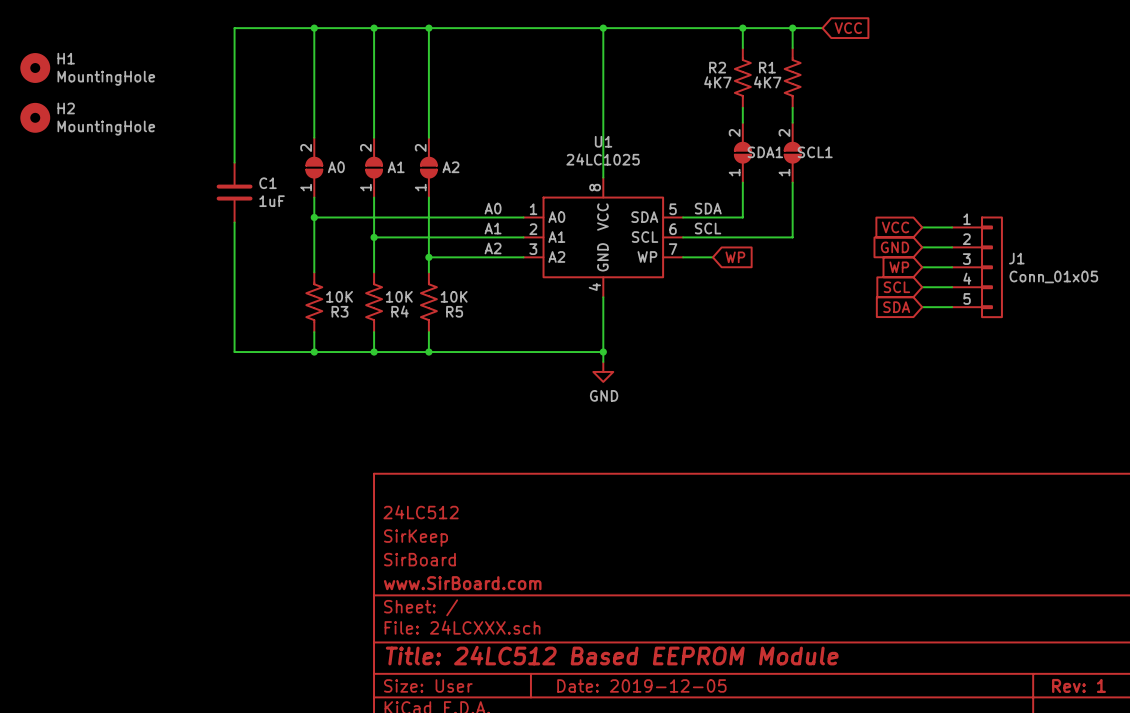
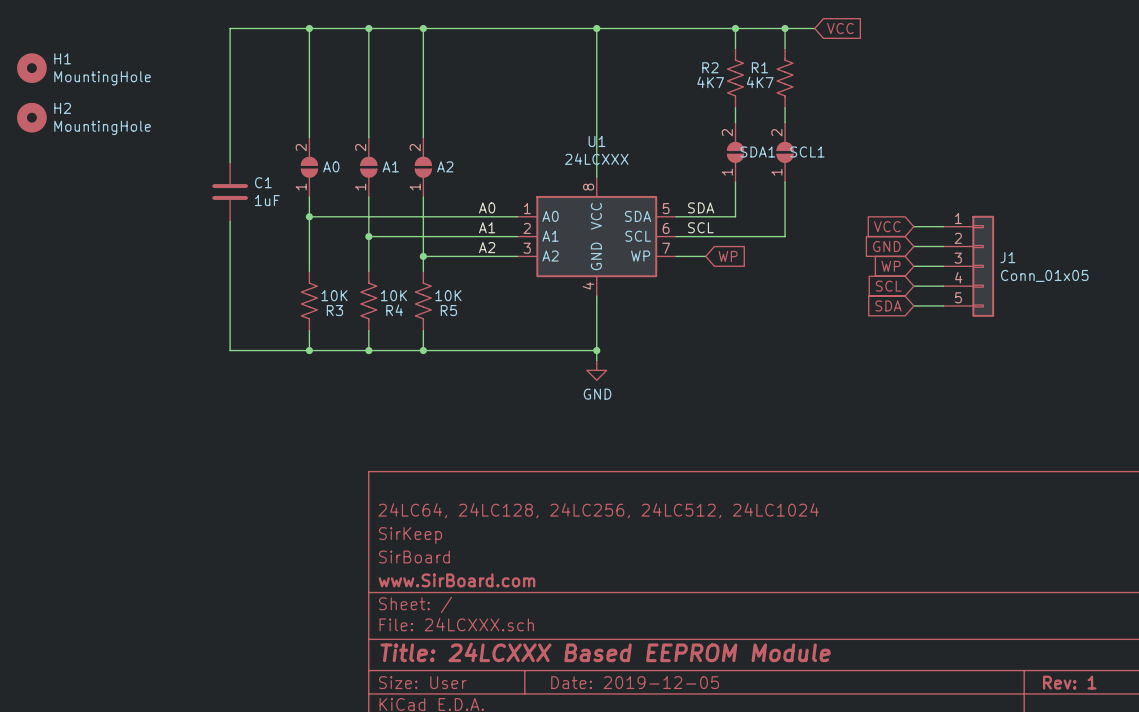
U1 value: 24LC1025 (603, 159) -> 24LCXXX (596, 159)
title block: 24LC512 (421, 512) -> 24LC64, 24LC128, 24LC256, 24LC512, 24LC1024 (598, 510)
title block: Title: 24LC512 Based EEPROM Module (612, 655) -> Title: 24LCXXX Based EEPROM Module (605, 652)

